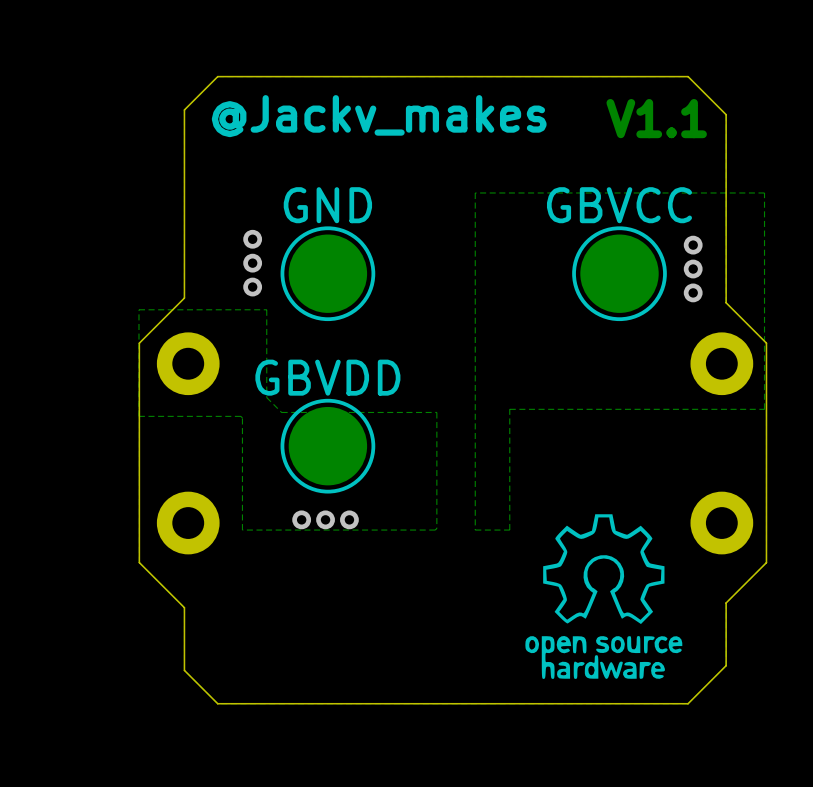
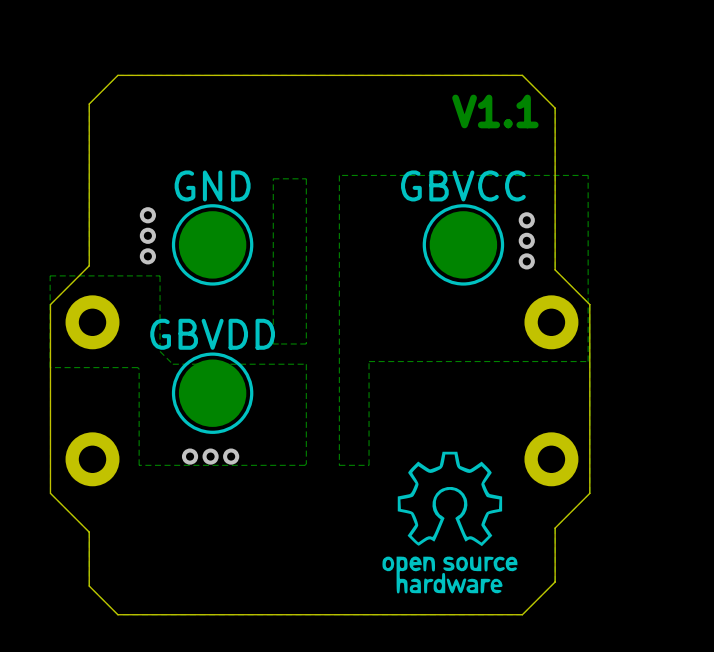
text: @Jackv_makes (379, 116) -> none
zone outline: none -> (306, 178) (306, 343) (273, 343) (273, 178) (306, 178)

